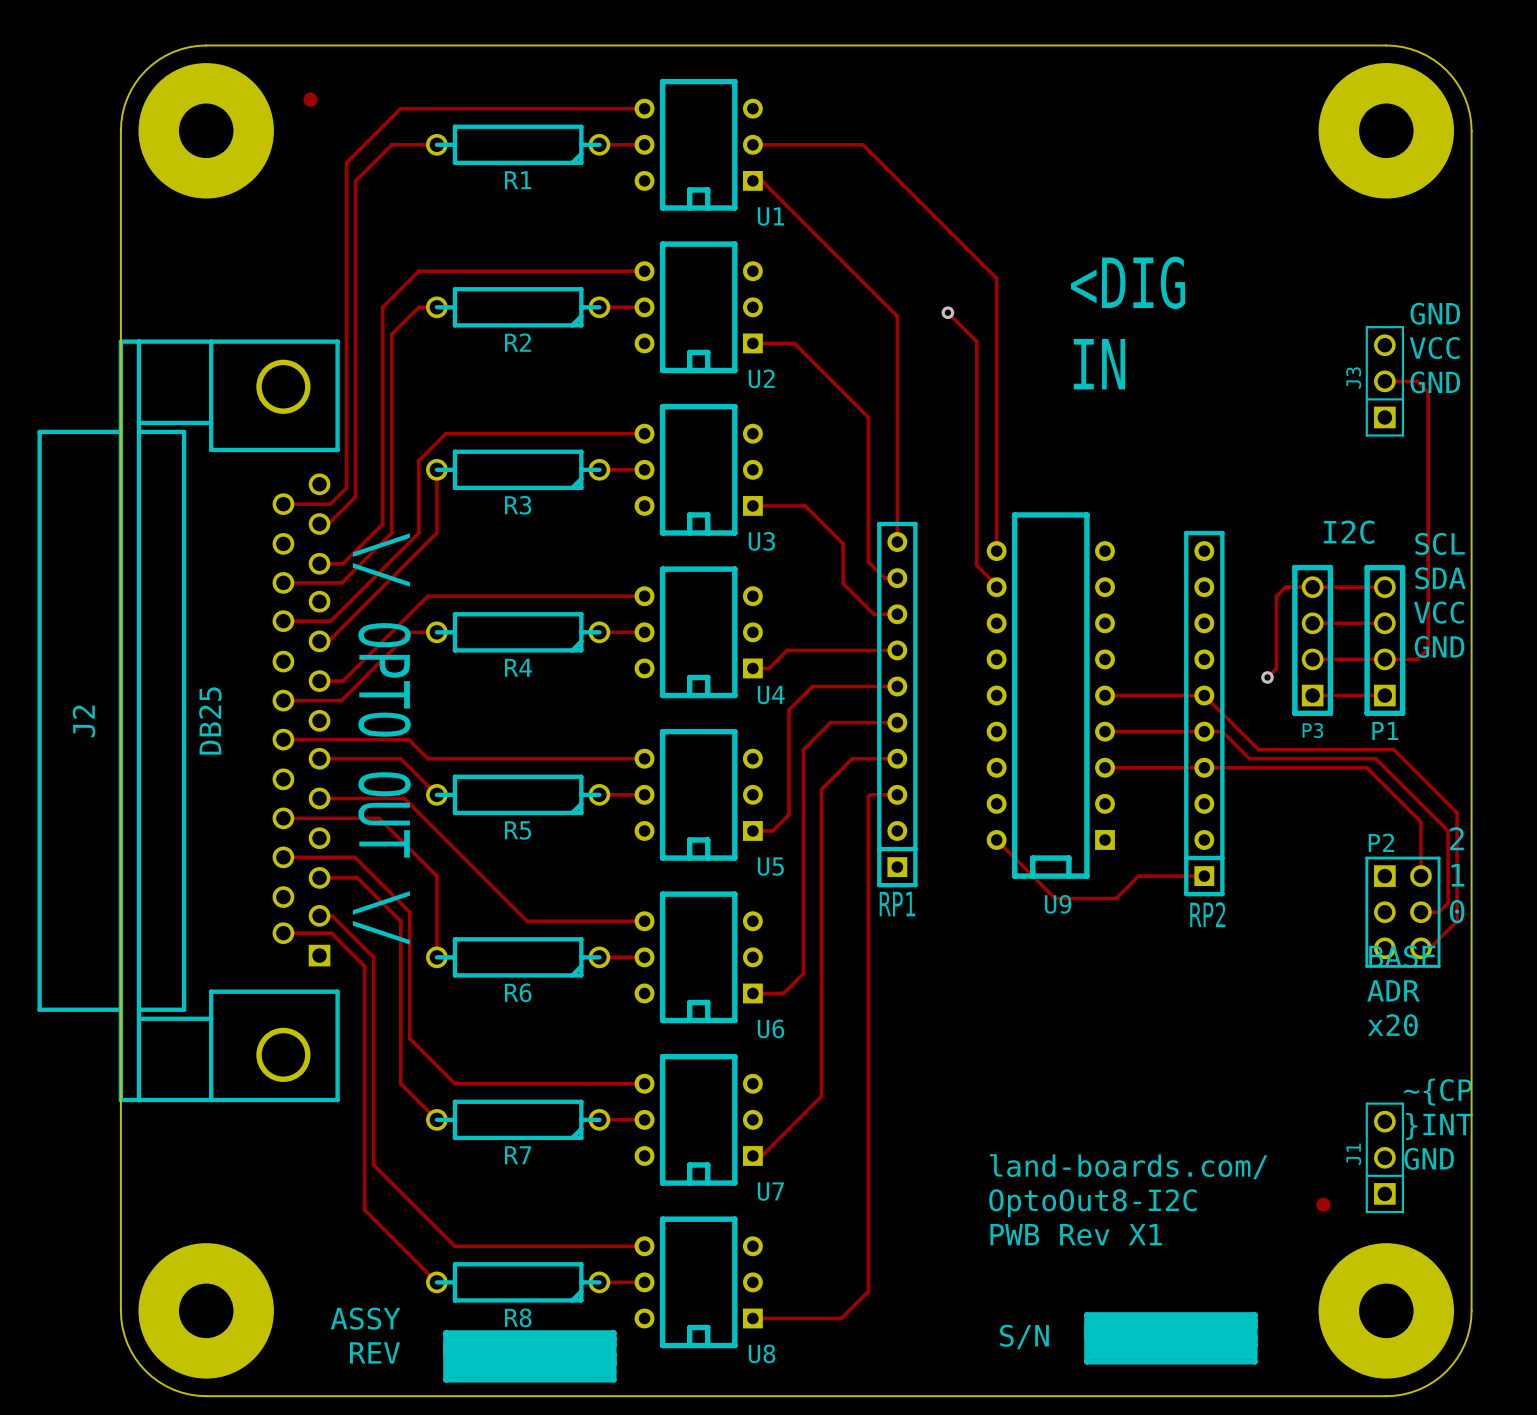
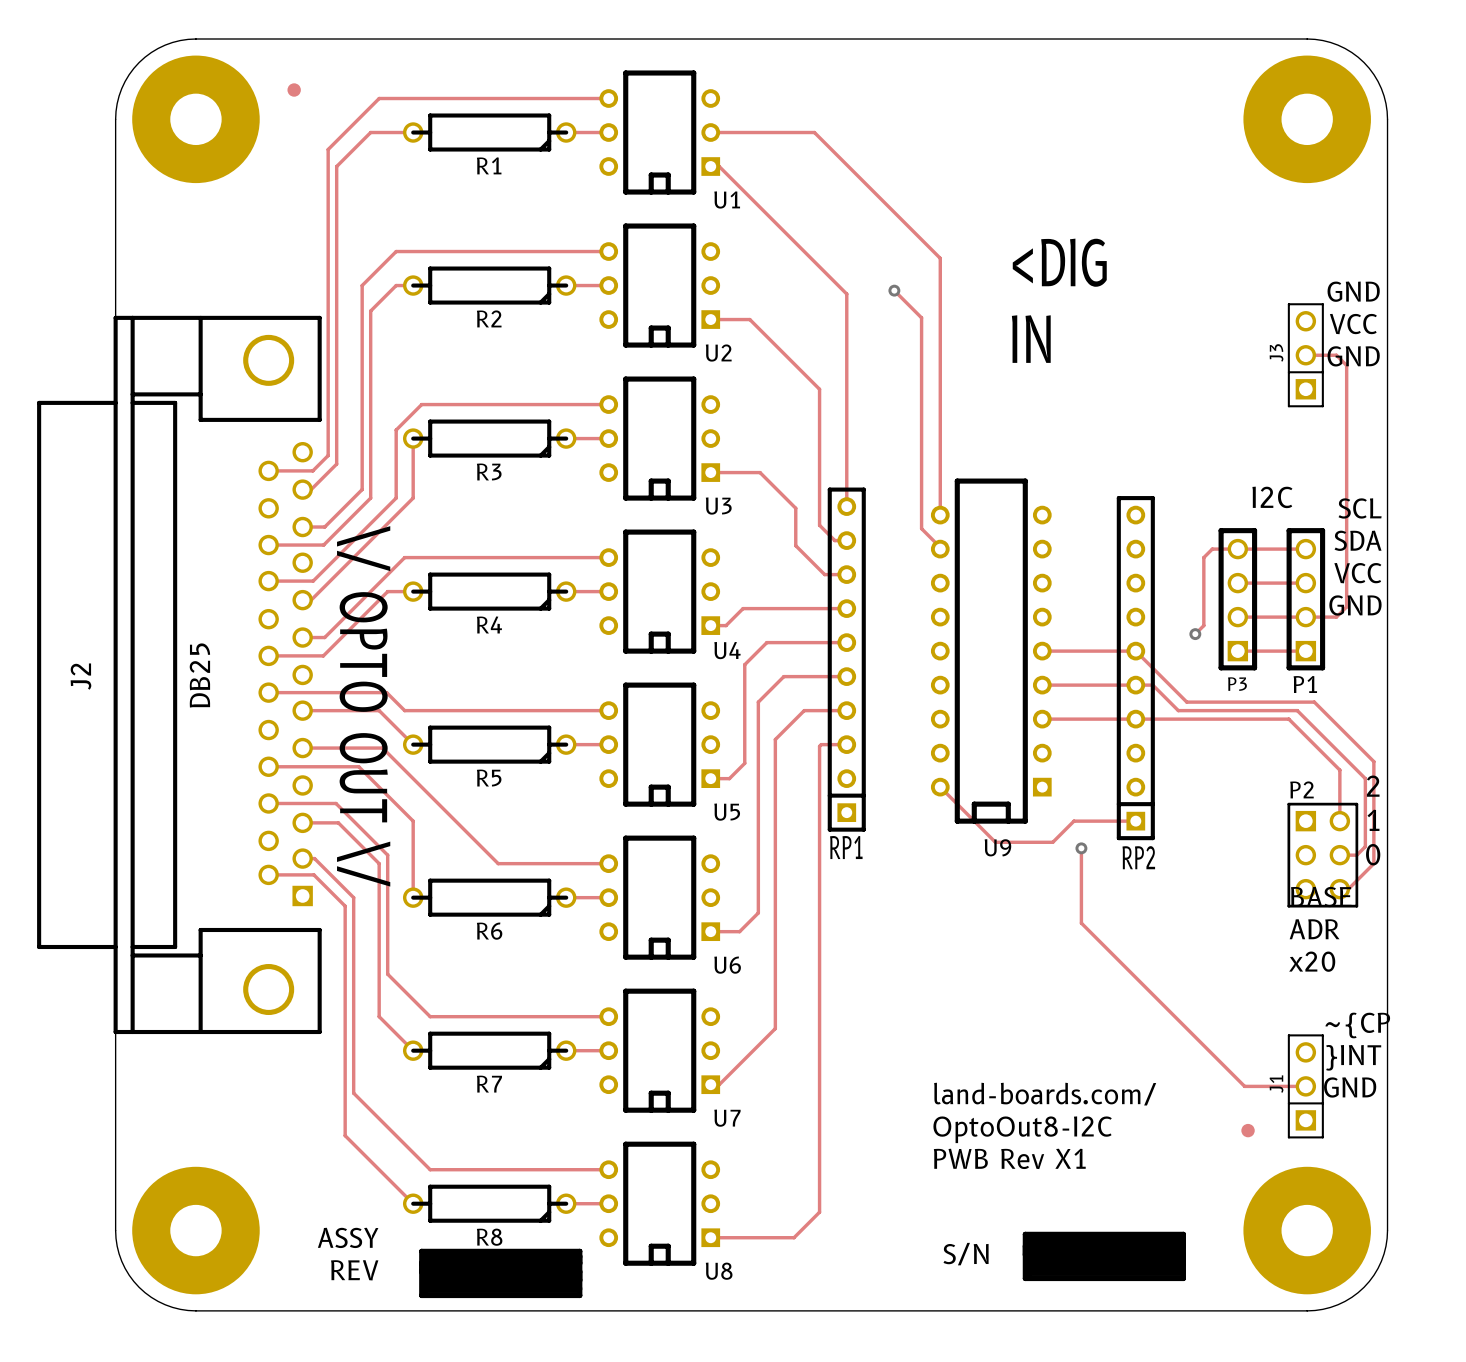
track: none -> (1081, 848) (1081, 923) (1244, 1086) (1305, 1086)
via: none -> (1081, 848)

